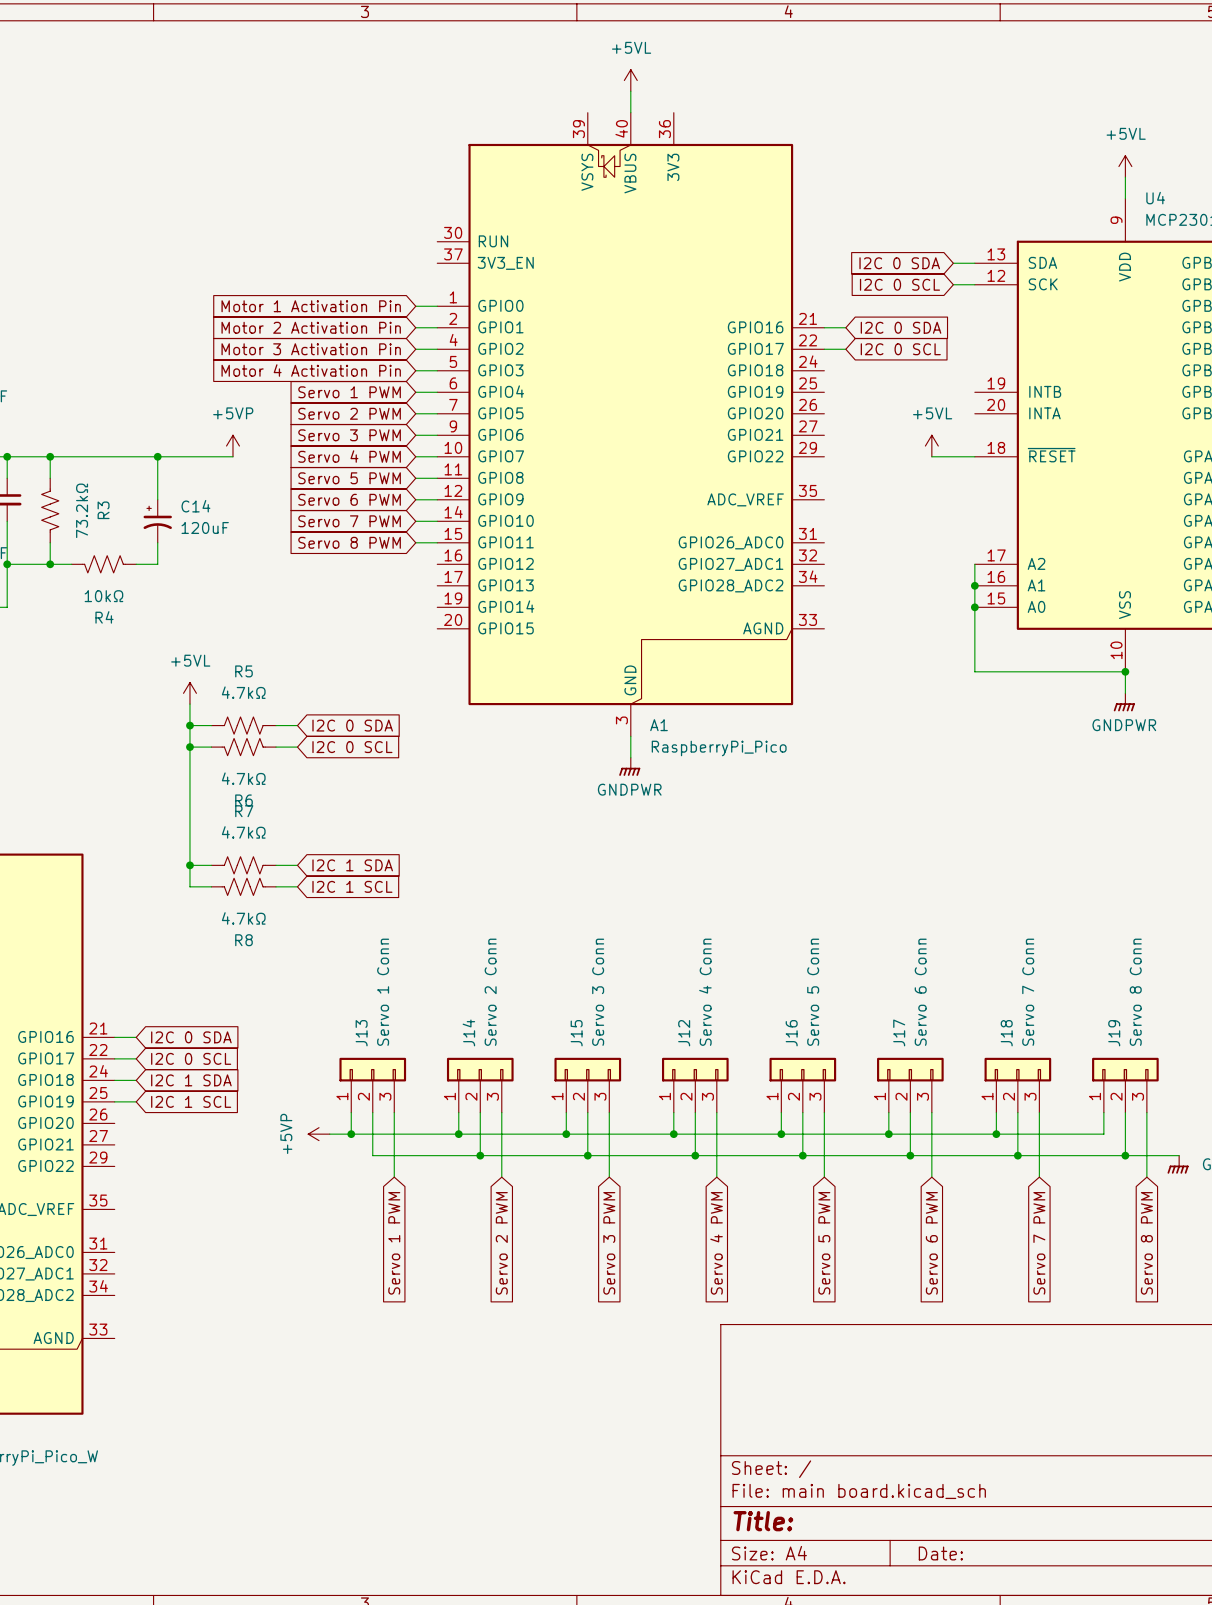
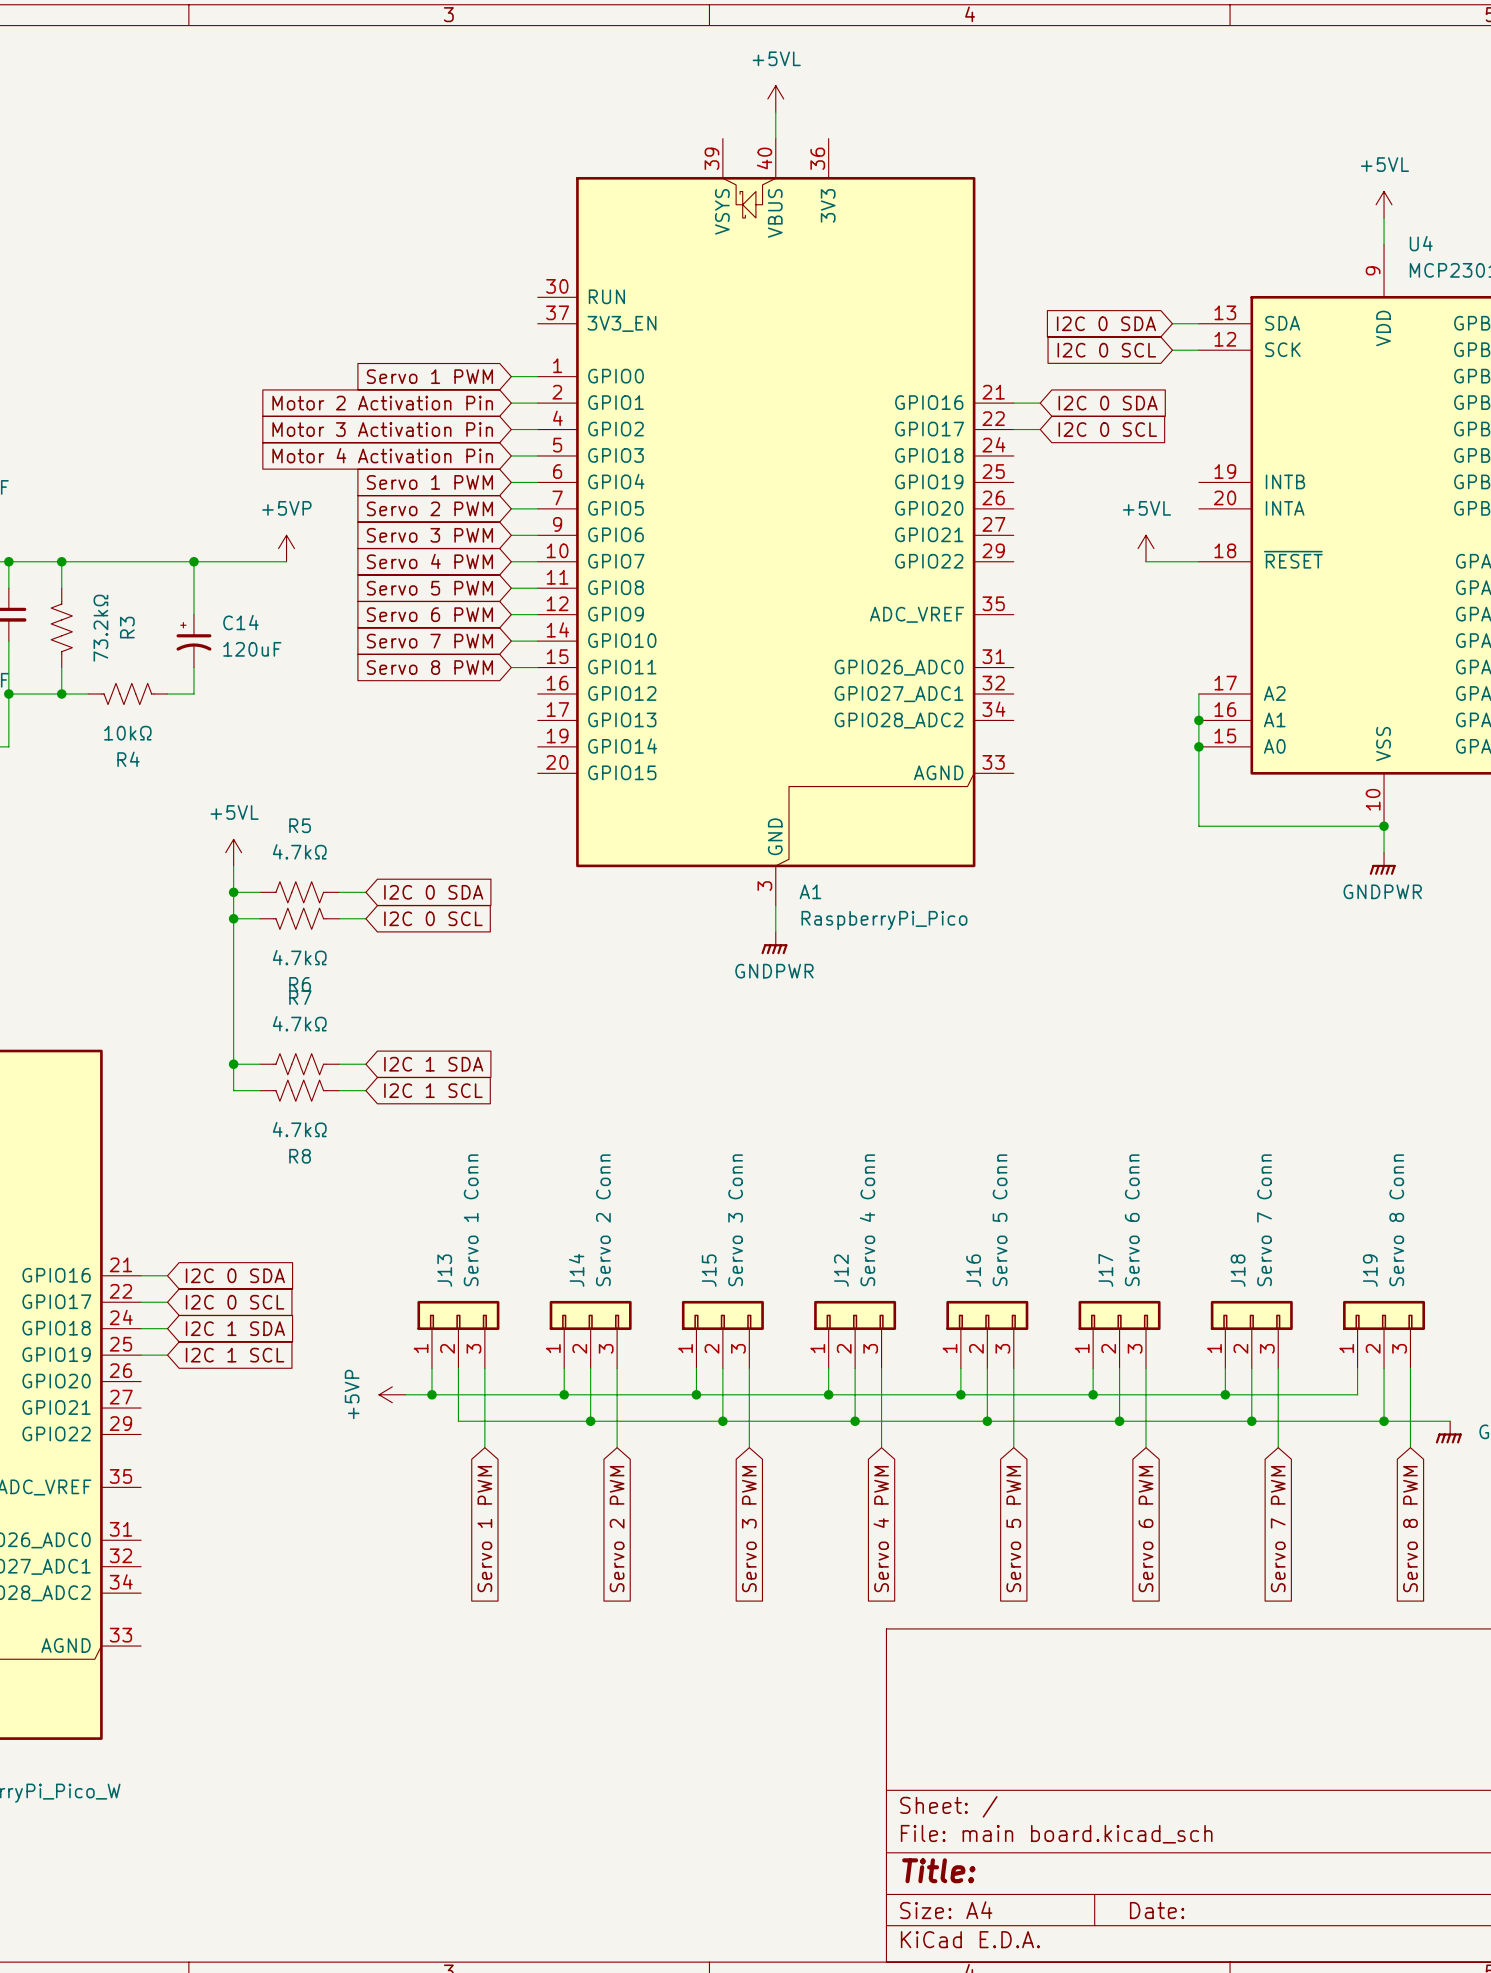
global label: Motor 1 Activation Pin (311, 306) -> Servo 1 PWM (429, 376)

